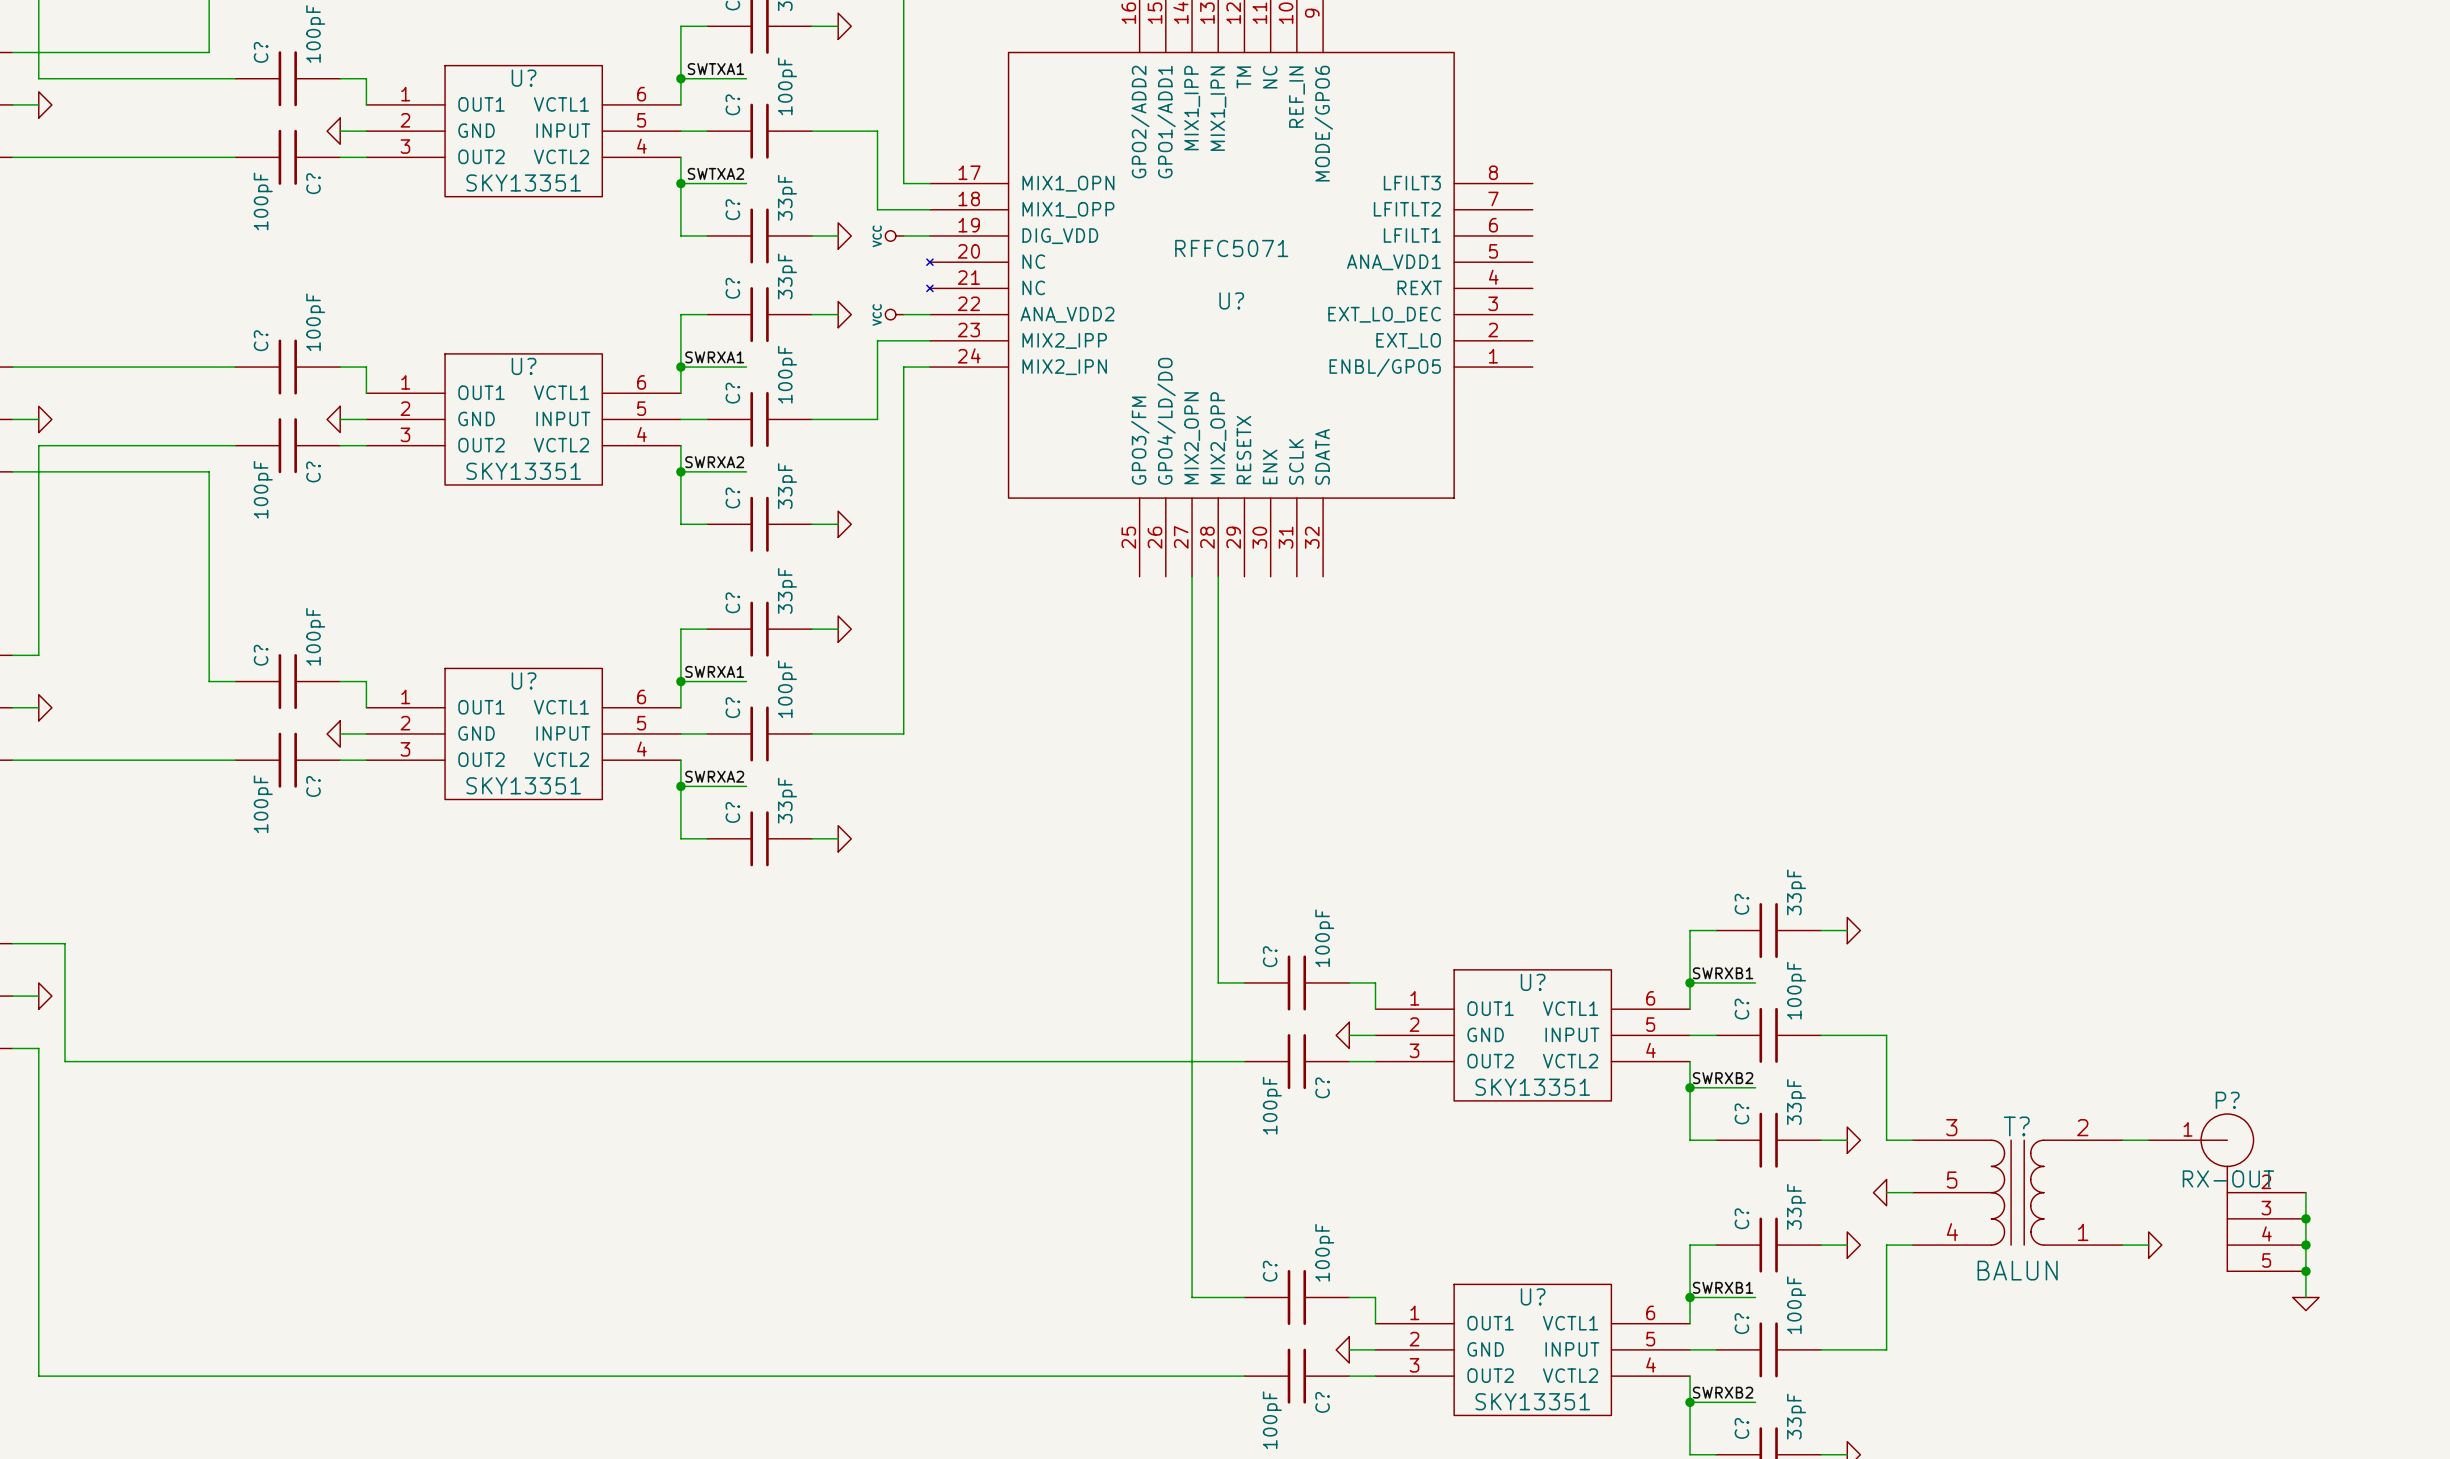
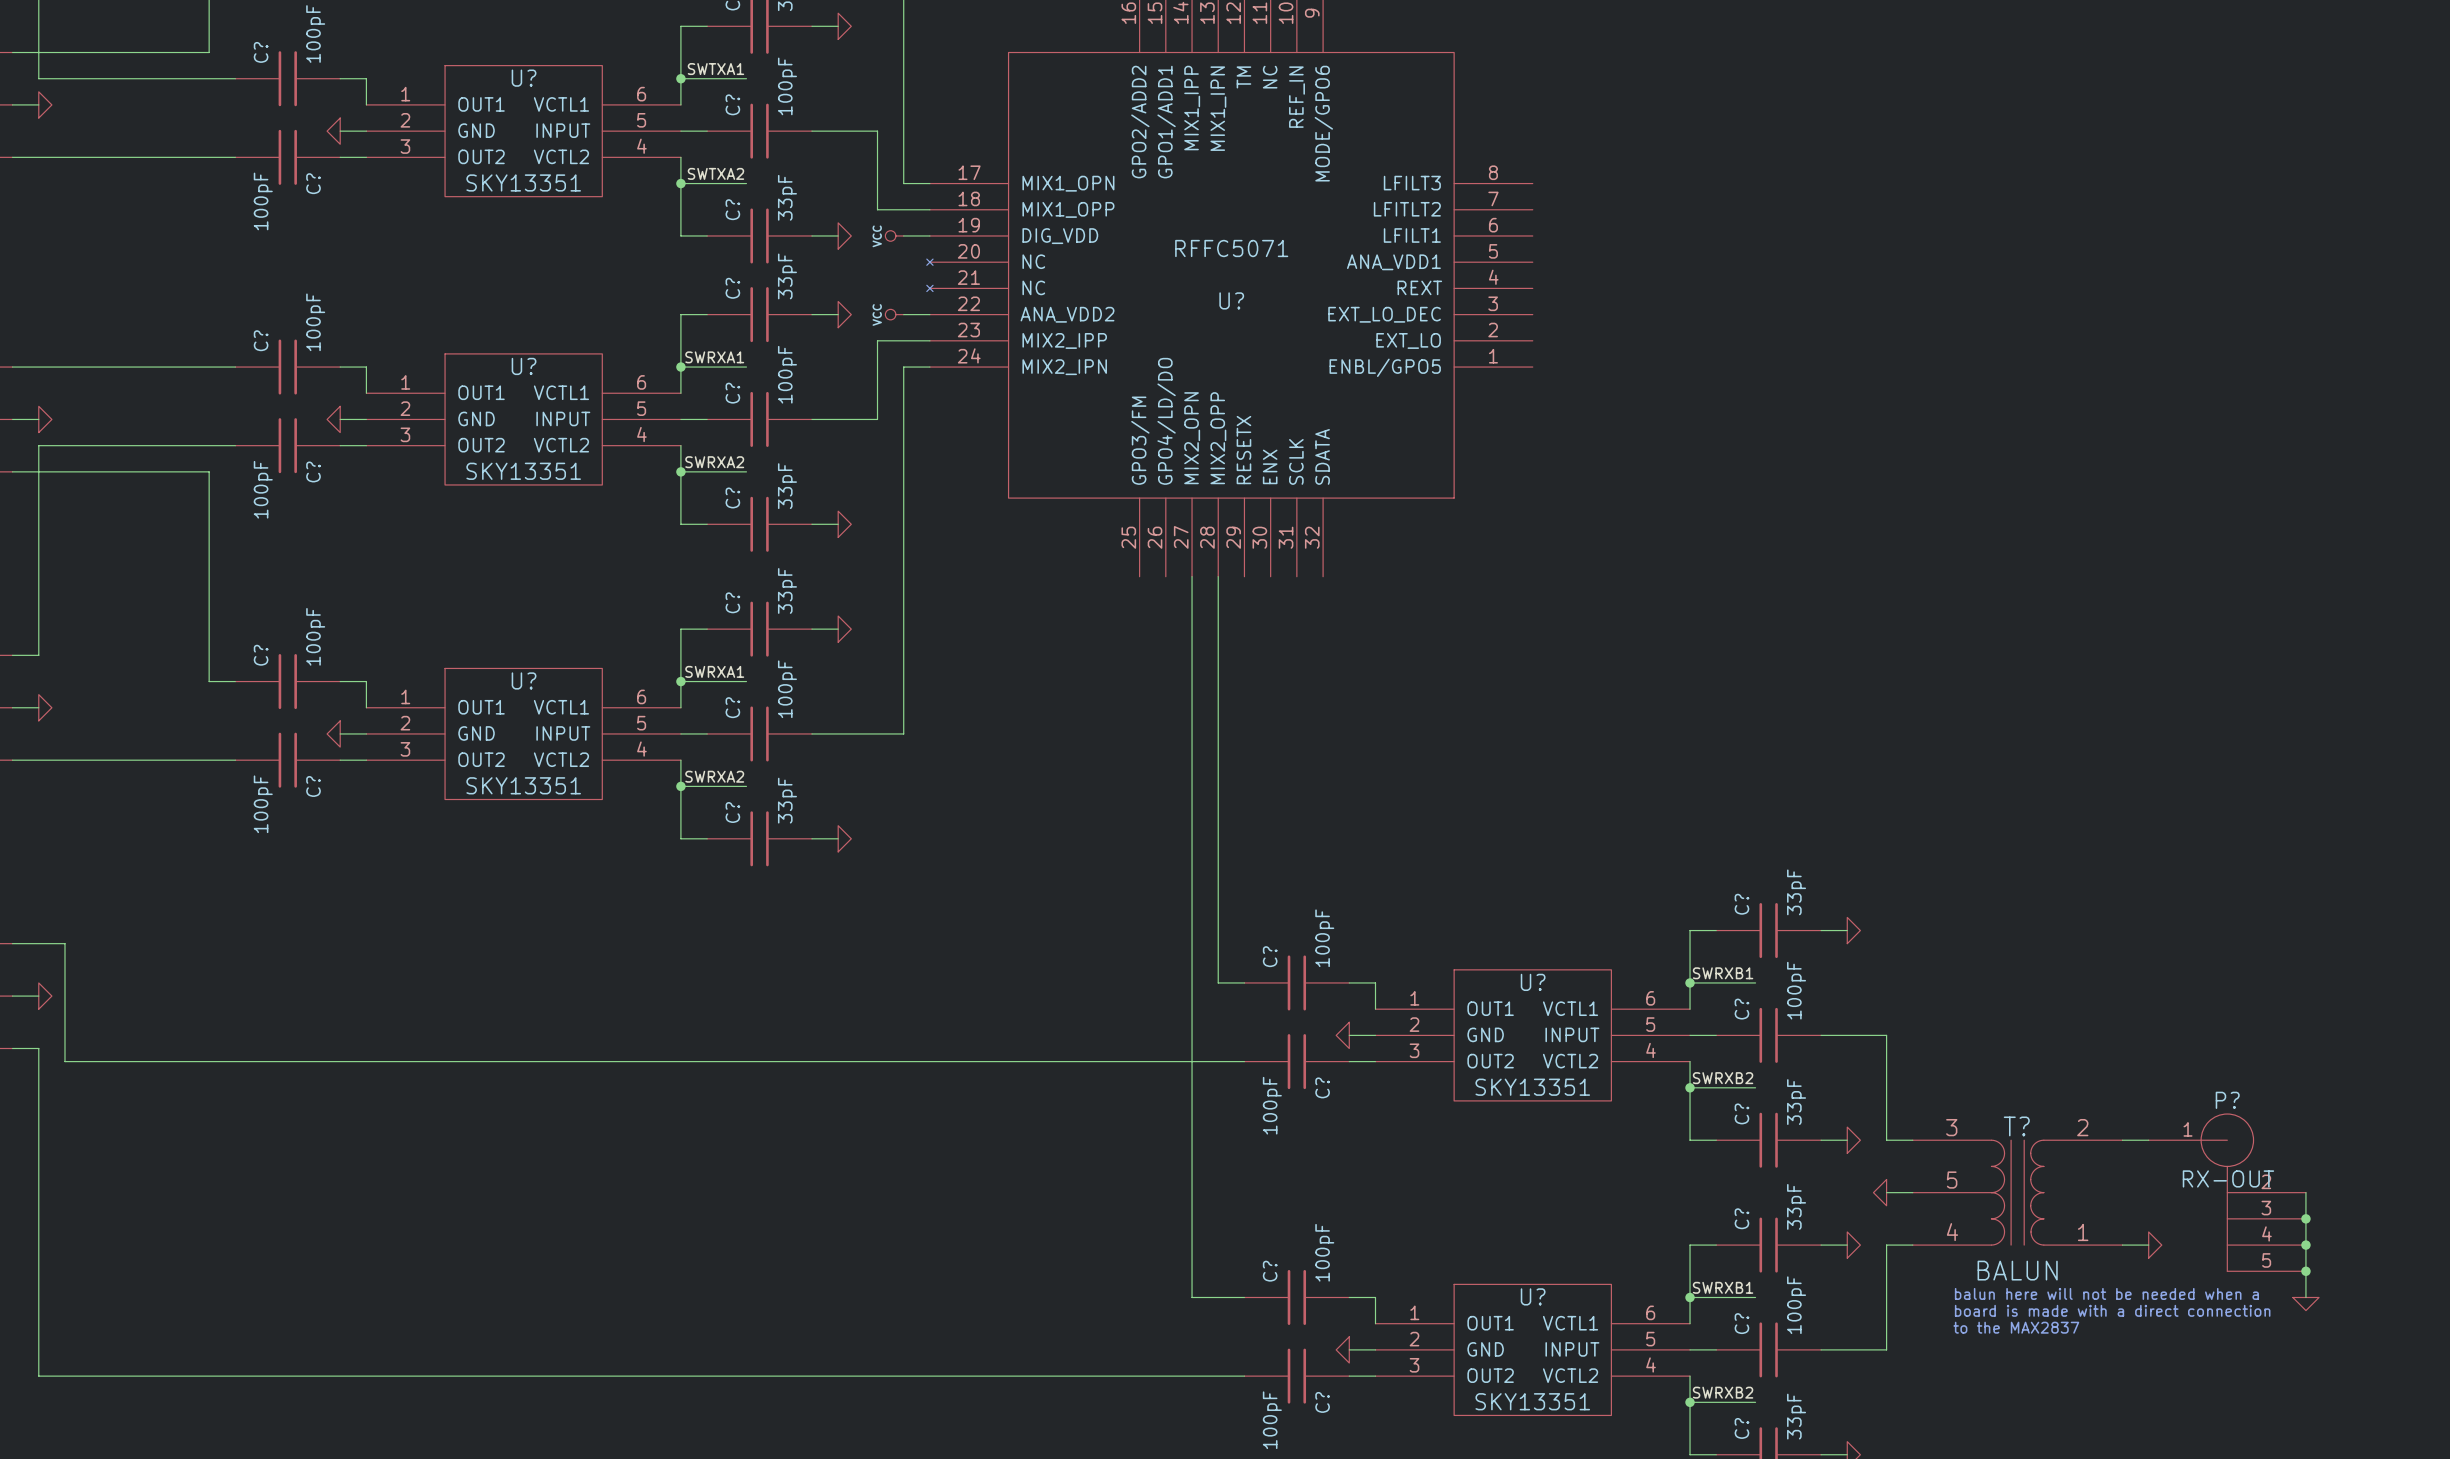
text: none -> balun here will not be needed when a (2106, 1293)
text: none -> board is made with a direct connection (2112, 1310)
text: none -> to the MAX2837 (2016, 1327)

